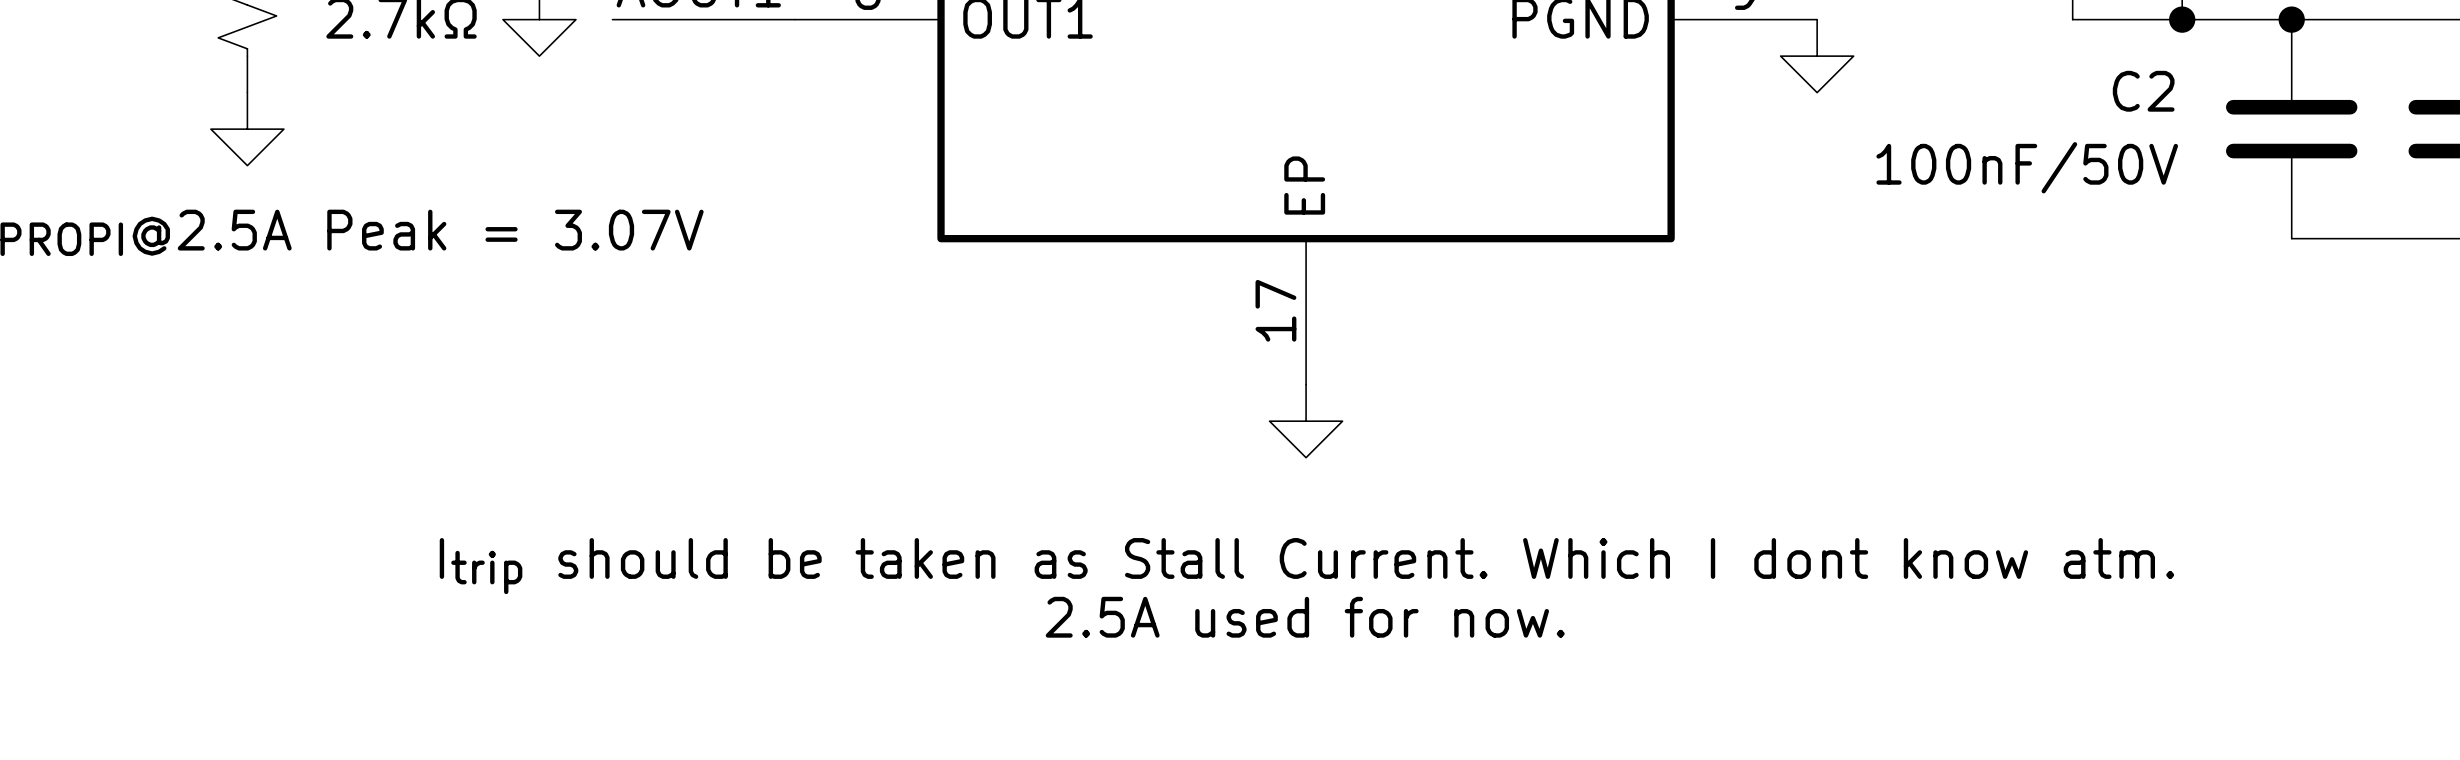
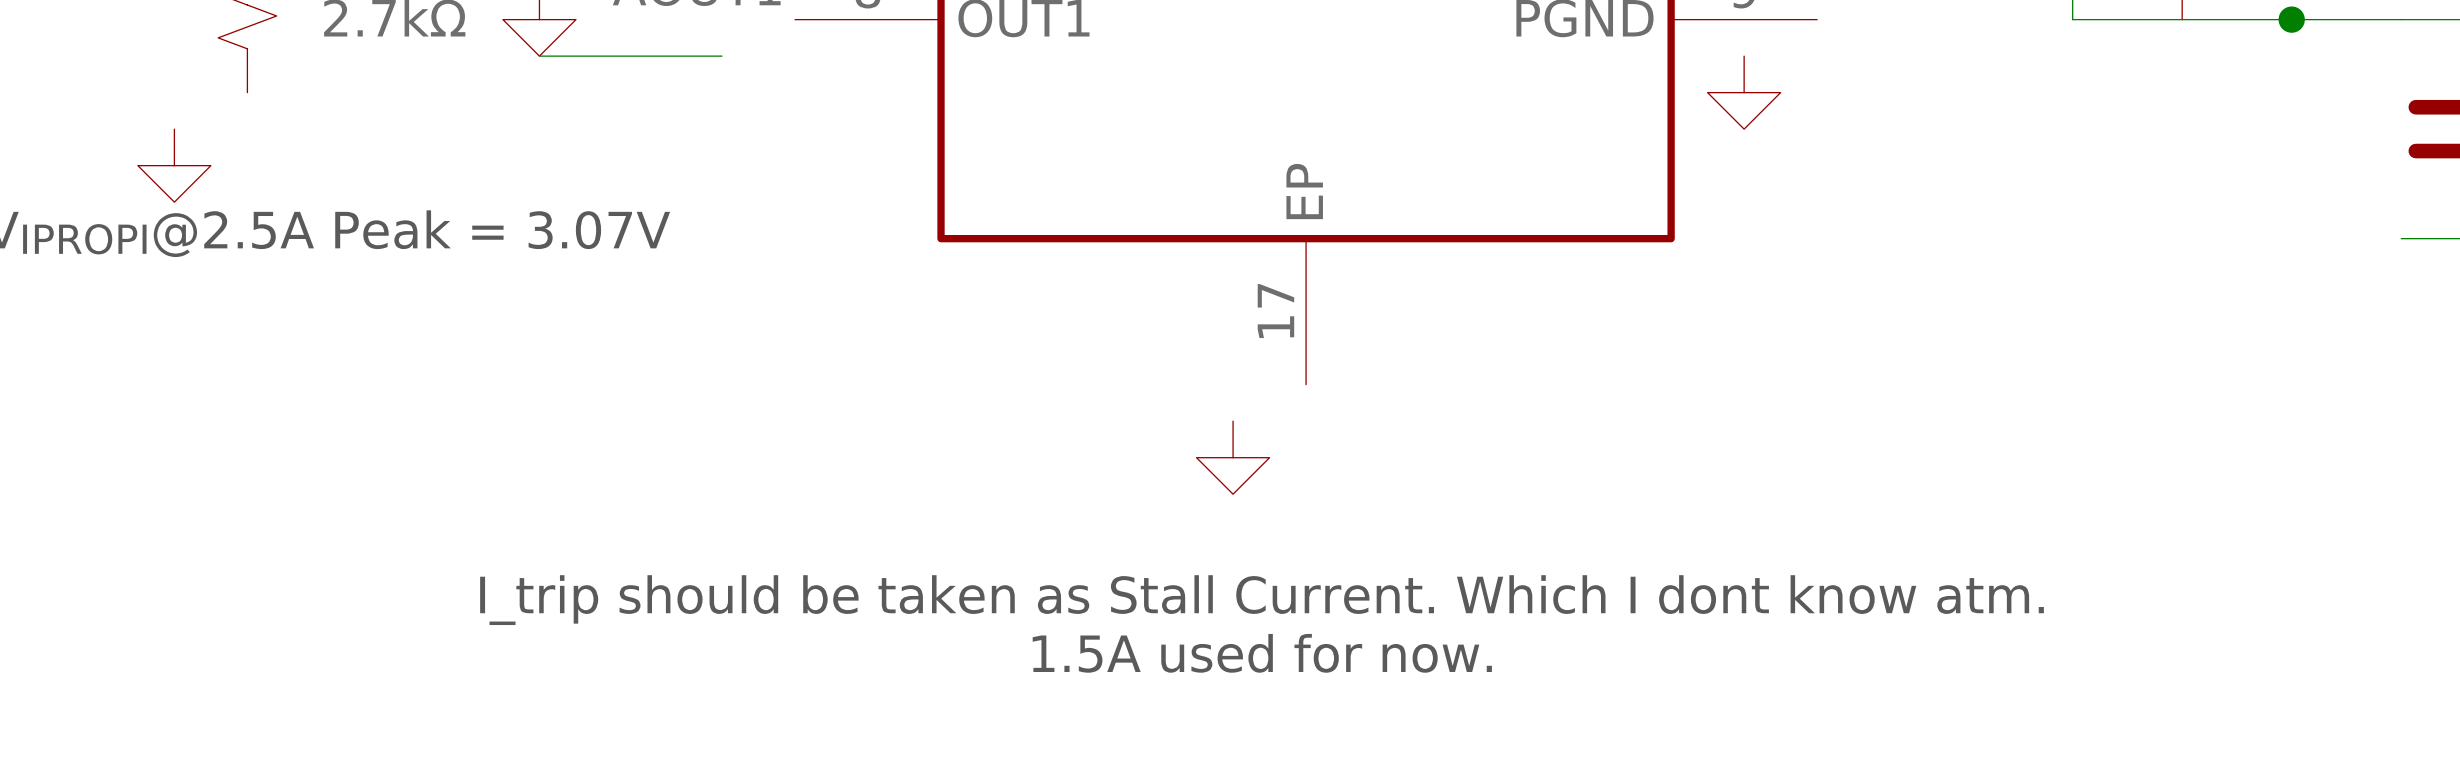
wire: (612, 19) (794, 19) -> (539, 56) (721, 56)
junction: (2182, 19) -> none
power symbol position: (1817, 56) -> (1744, 92)
power symbol position: (247, 129) -> (174, 165)
C2: 100nF/50V (2291, 129) -> none
wire: (2291, 238) (2401, 238) -> none
power symbol position: (1306, 421) -> (1233, 457)
text: Itrip should be taken as Stall Current. Which I dont know atm. (1306, 566) -> I_trip should be taken as Stall Current. Which I dont know atm. (1262, 600)
text: 2.5A used for now. (1305, 617) -> 1.5A used for now. (1262, 653)

